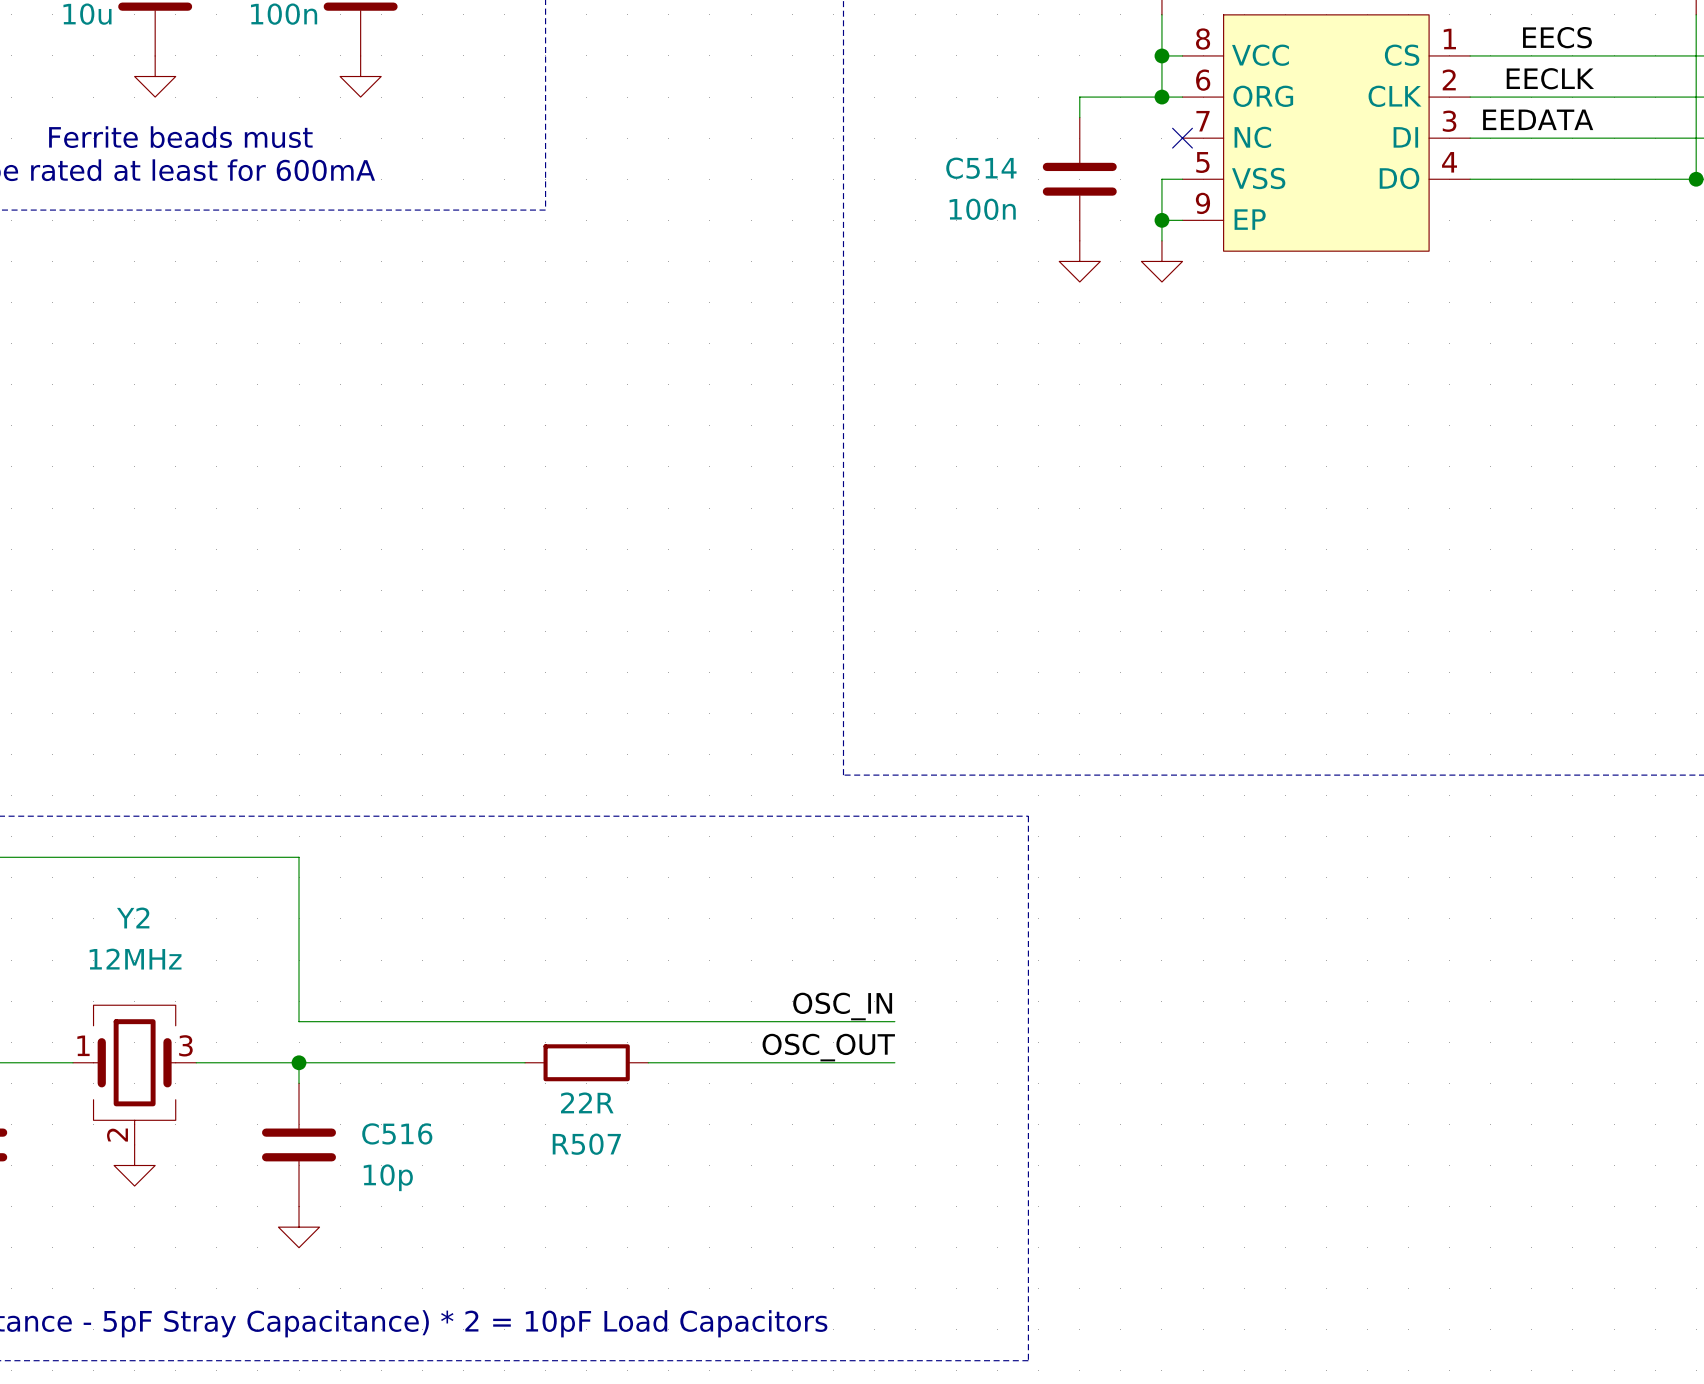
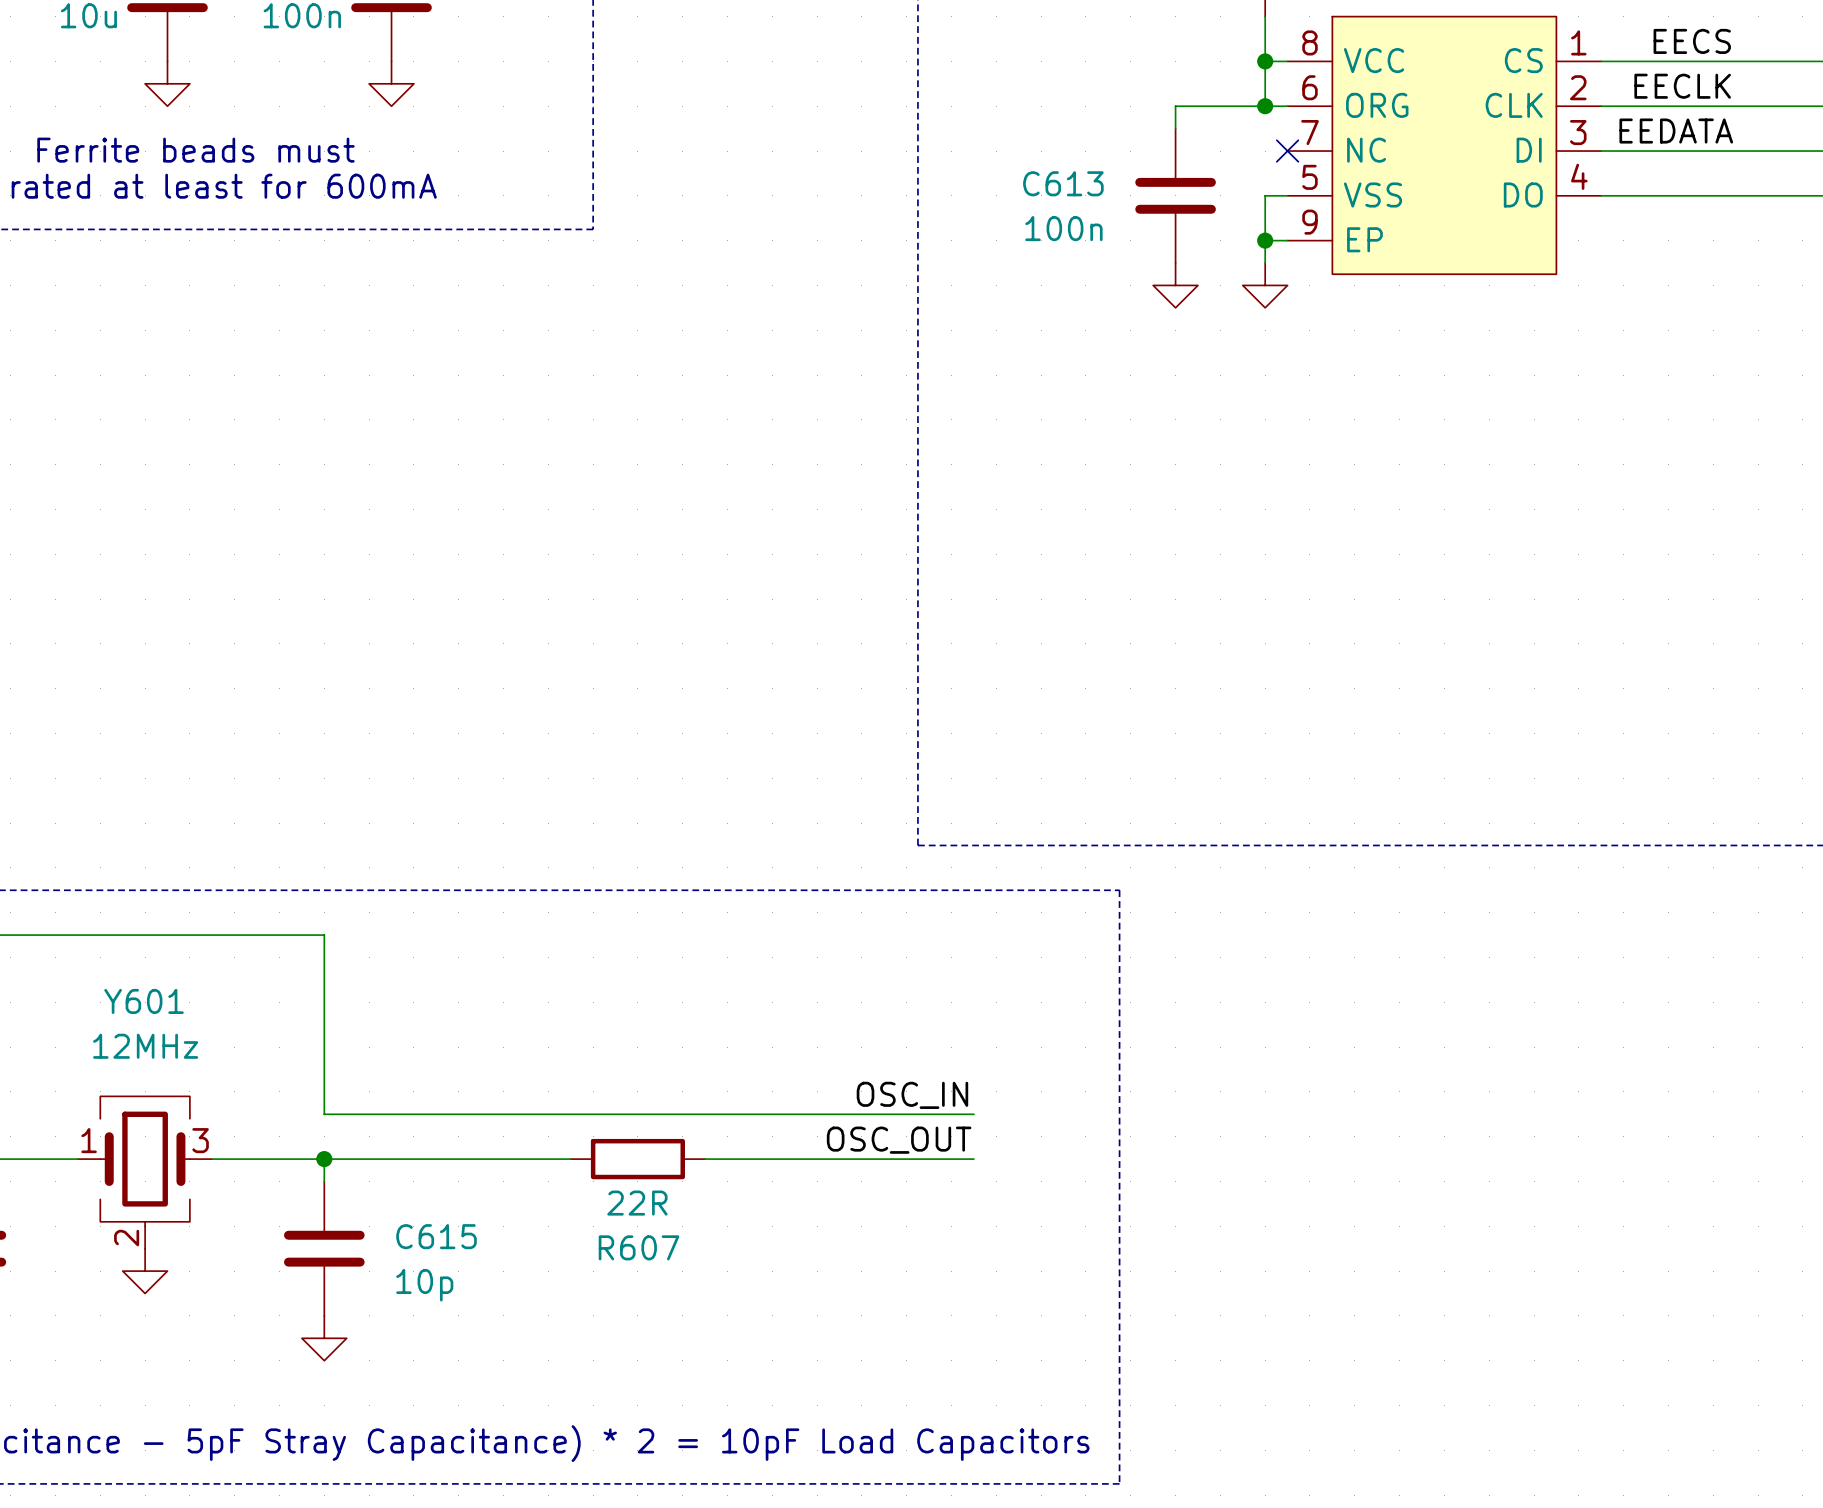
C514 name: C514 (981, 168) -> C613 (1063, 183)
Y2 name: Y2 (133, 917) -> Y601 (144, 1001)
C516 name: C516 (397, 1133) -> C615 (436, 1236)
R507 name: R507 (586, 1144) -> R607 (639, 1247)

